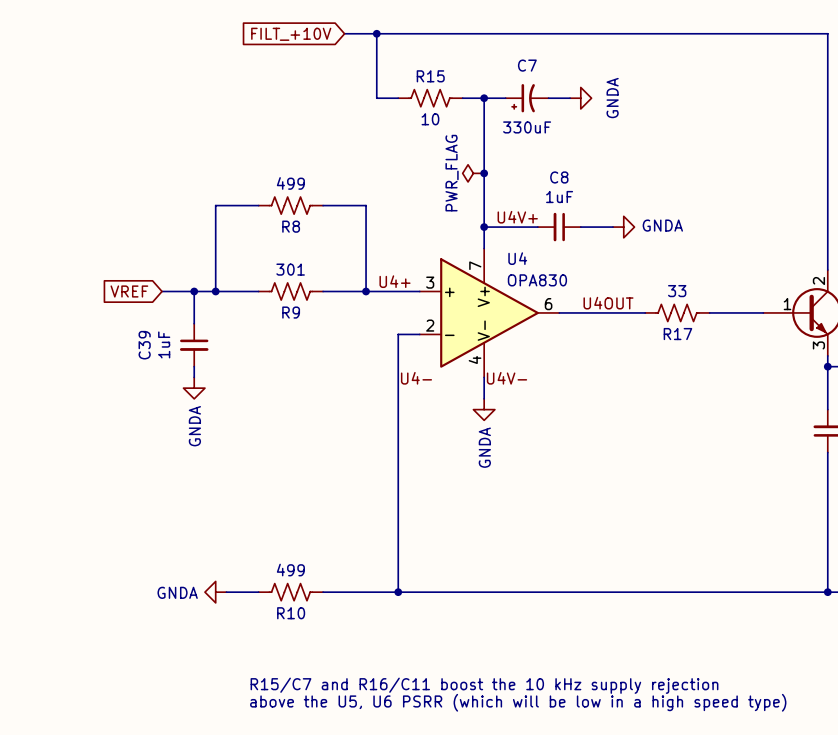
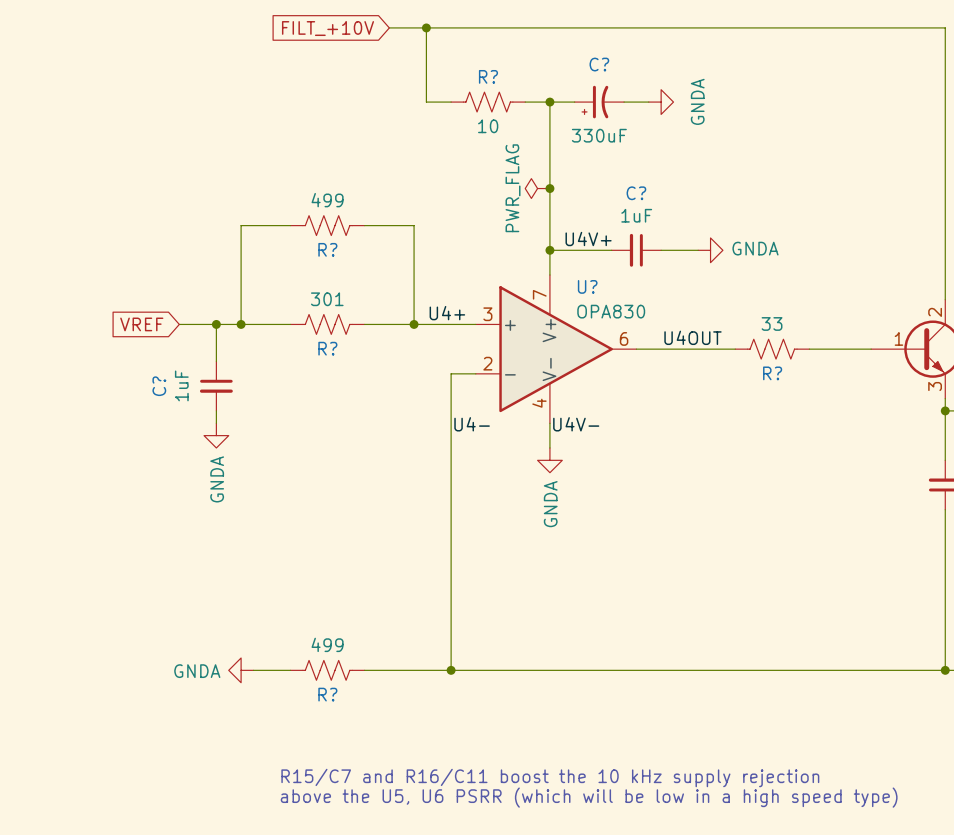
C7 name: C7 (527, 65) -> C? (599, 64)
R15 name: R15 (430, 76) -> R? (488, 76)
C8 name: C8 (559, 177) -> C? (636, 193)
R8 name: R8 (291, 226) -> R? (327, 249)
U4 name: U4 (517, 258) -> U? (587, 286)
R9 name: R9 (291, 312) -> R? (327, 348)
R17 name: R17 (677, 334) -> R? (772, 373)
C39 name: C39 (144, 345) -> C? (159, 386)
R10 name: R10 (291, 613) -> R? (327, 694)

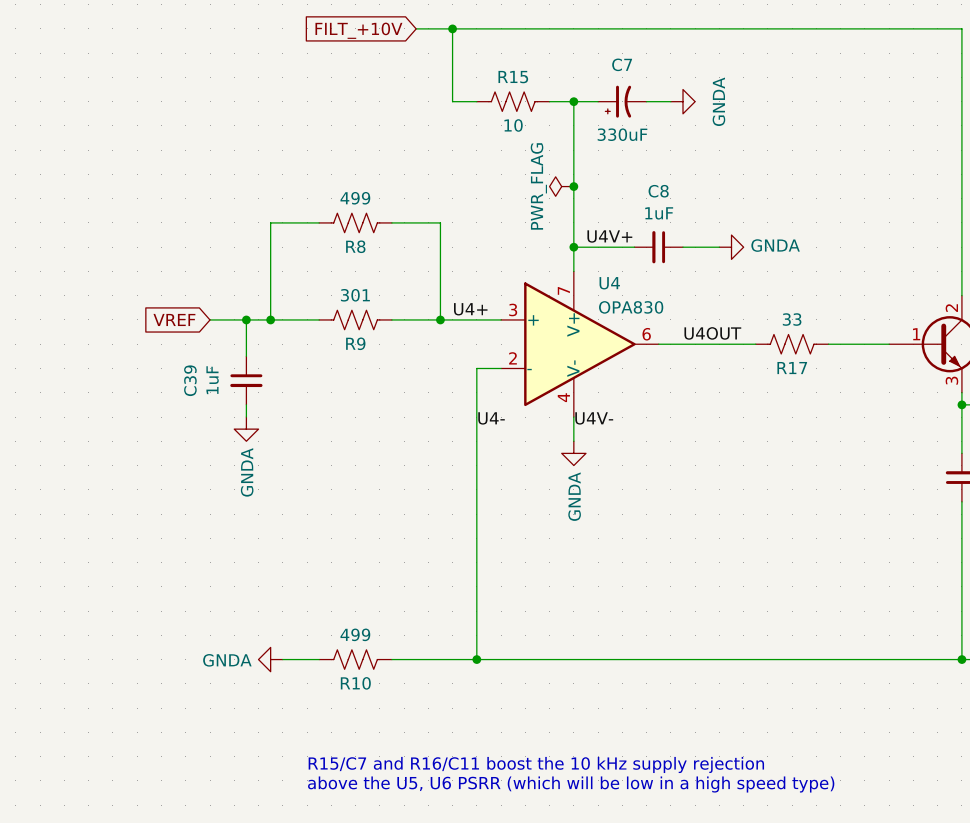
C? name: C? (599, 64) -> C7 (622, 64)
R? name: R? (488, 76) -> R15 (513, 77)
C? name: C? (636, 193) -> C8 (658, 191)
R? name: R? (327, 249) -> R8 (355, 246)
U? name: U? (587, 286) -> U4 (609, 283)
R? name: R? (327, 348) -> R9 (355, 343)
R? name: R? (772, 373) -> R17 (792, 368)
C? name: C? (159, 386) -> C39 (190, 380)
R? name: R? (327, 694) -> R10 (355, 683)

